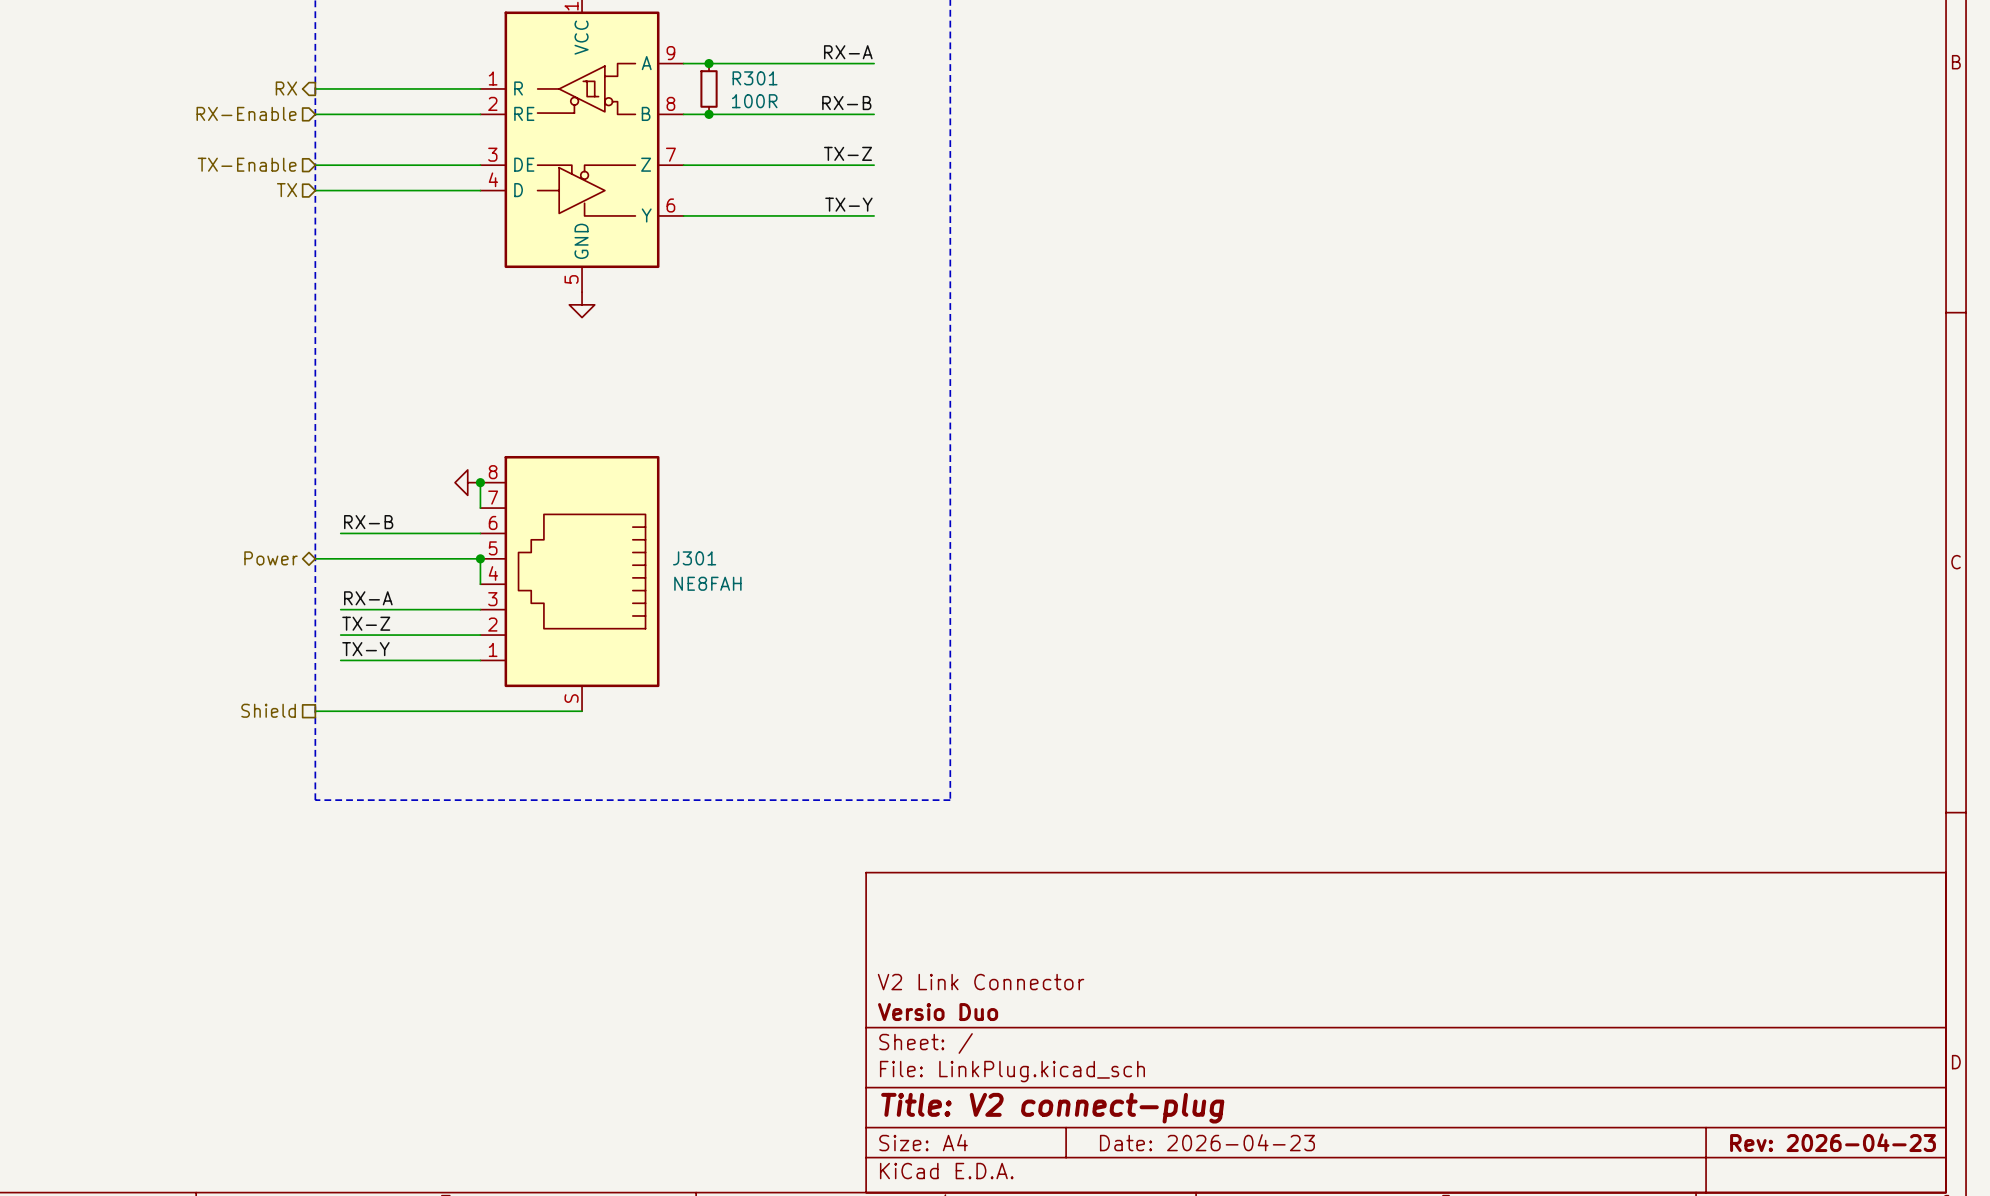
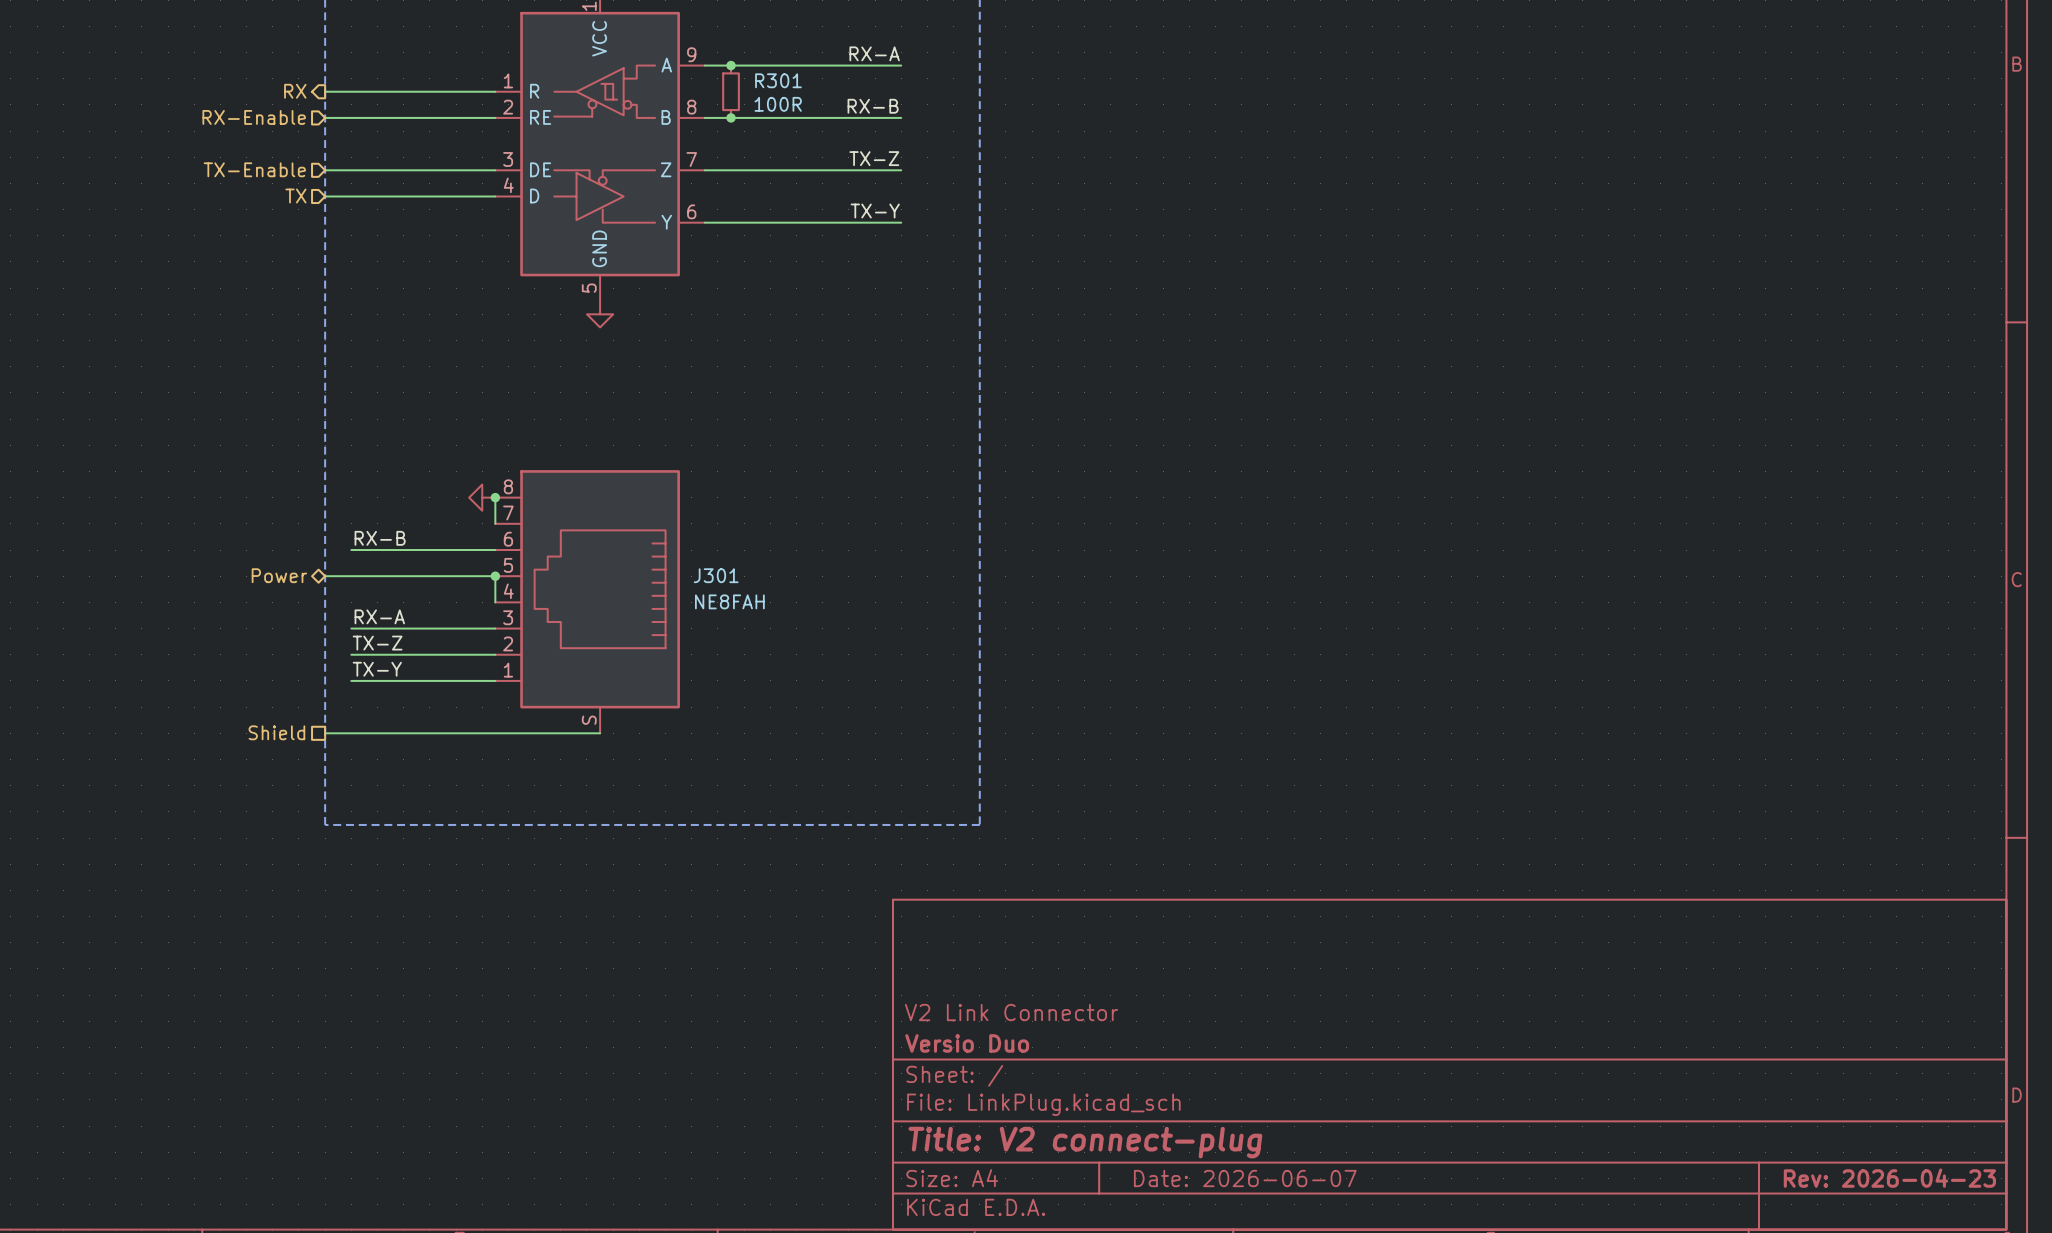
title block: Date: 2026-04-23 (1207, 1142) -> Date: 2026-06-07 (1245, 1178)

